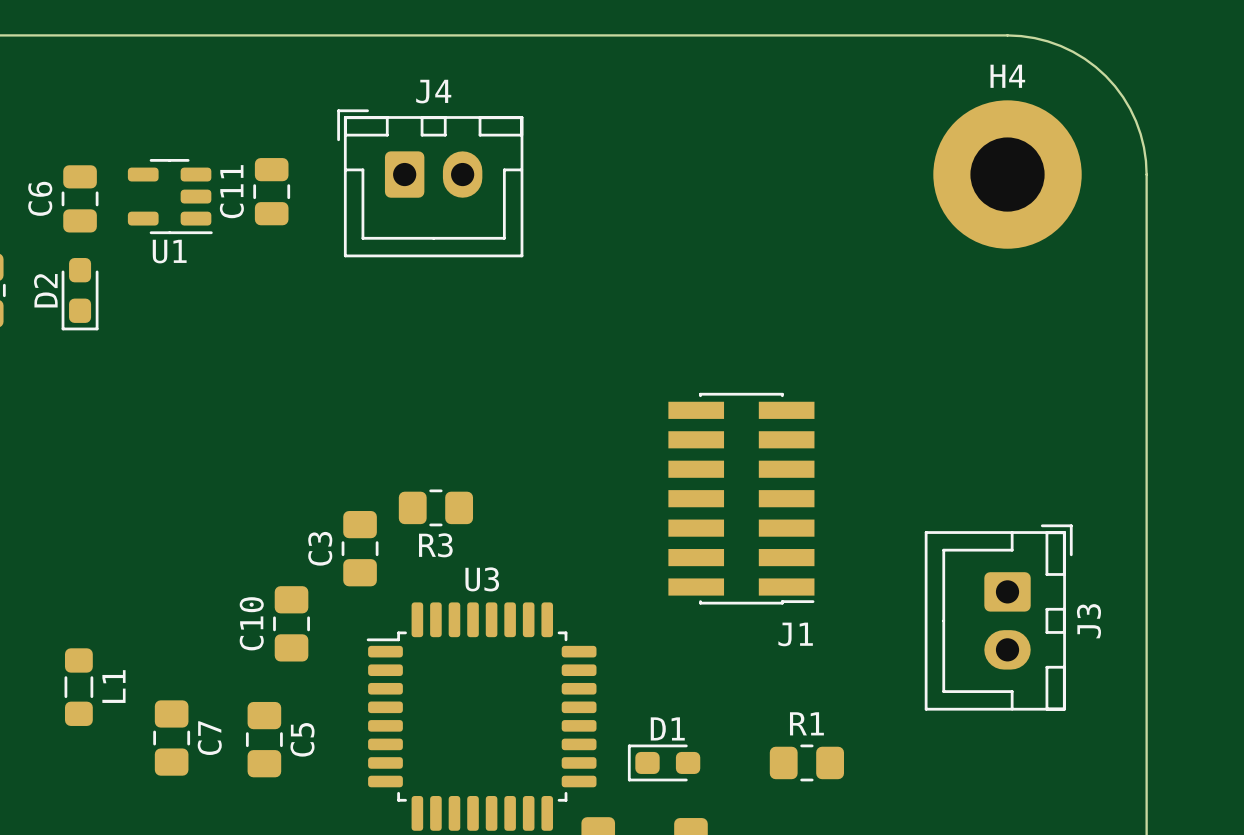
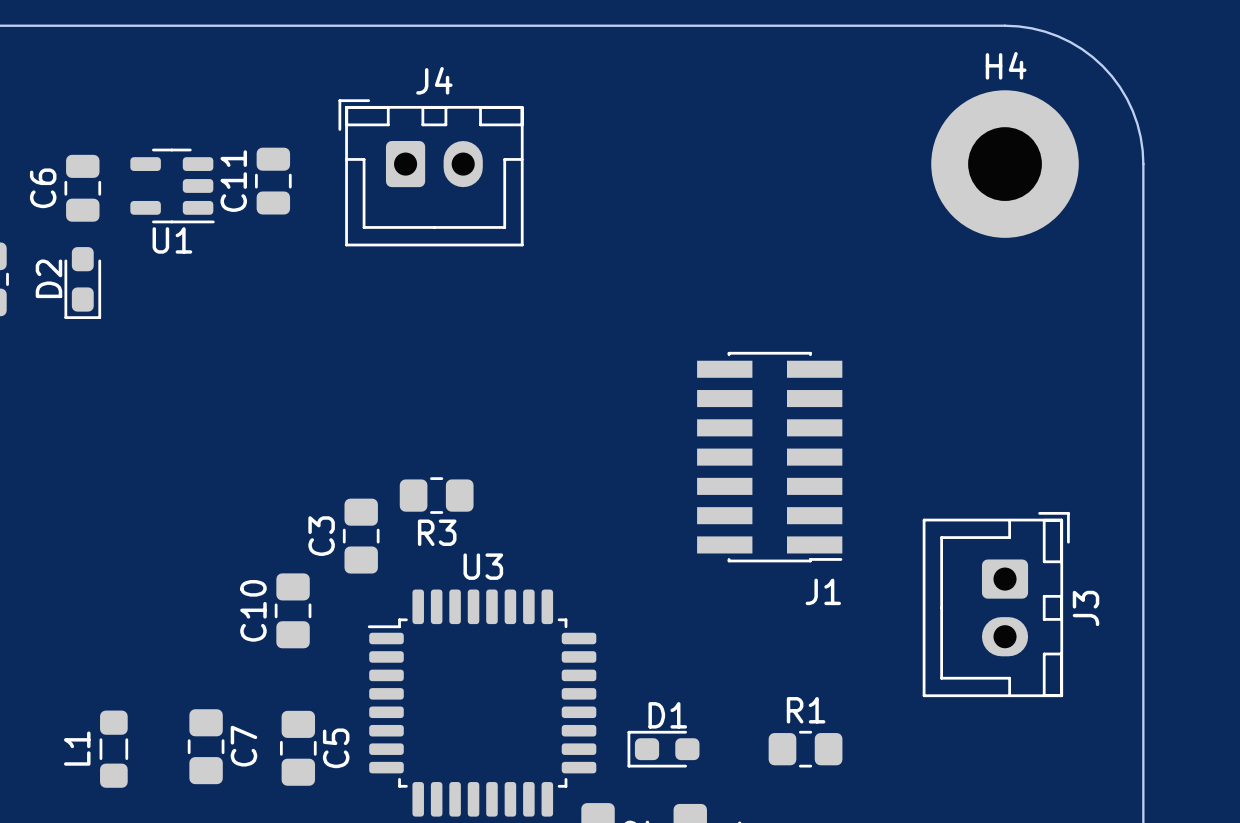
J1 position: (741, 498) -> (769, 457)
L1 name position: L1 (113, 686) -> L1 (77, 748)
L1 position: (78, 687) -> (113, 749)
C7 position: (171, 738) -> (206, 746)
C5 position: (264, 739) -> (298, 748)

